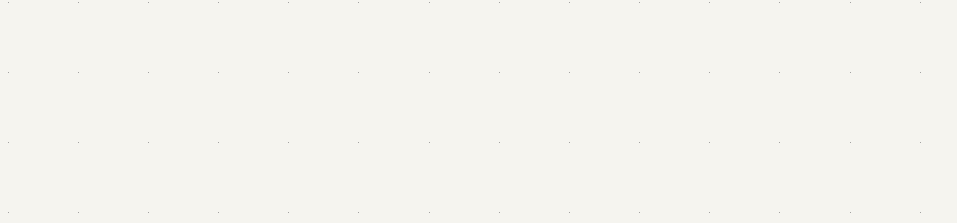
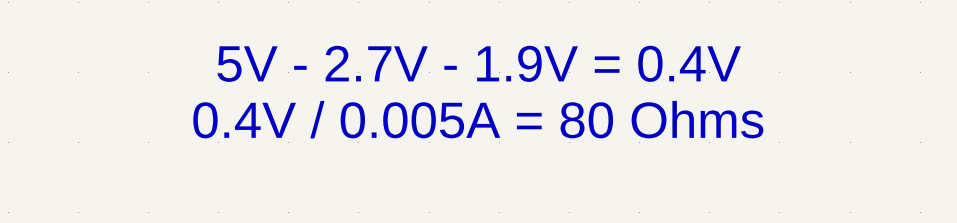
text: none -> 5V - 2.7V - 1.9V = 0.4V (479, 63)
text: none -> 0.4V / 0.005A = 80 Ohms (478, 119)

